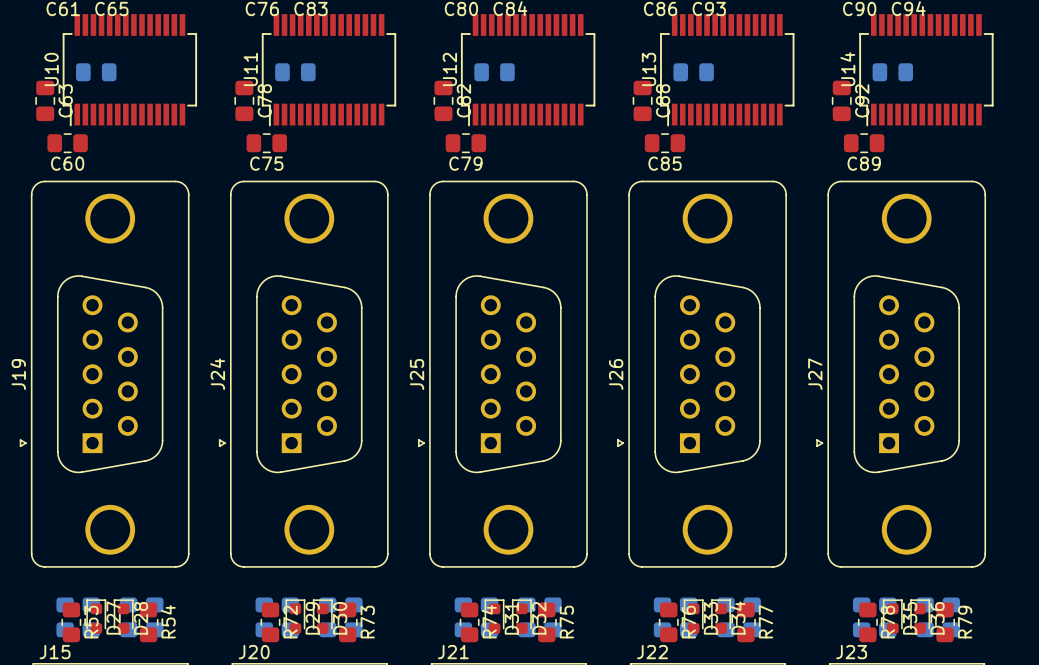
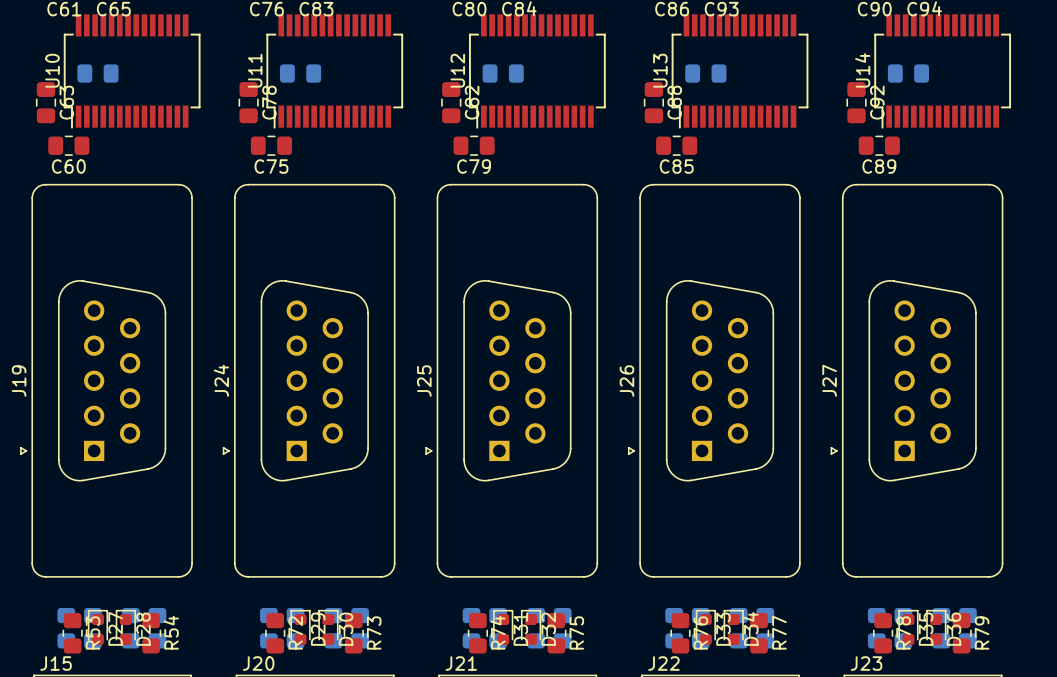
J19 footprint: [19, 180, 190, 568] -> [20, 183, 193, 578]
J24 footprint: [218, 180, 389, 568] -> [222, 183, 396, 578]
J25 footprint: [418, 180, 588, 568] -> [425, 183, 599, 578]
J26 footprint: [617, 180, 787, 568] -> [628, 183, 801, 578]
J27 footprint: [816, 180, 987, 568] -> [830, 183, 1004, 578]

